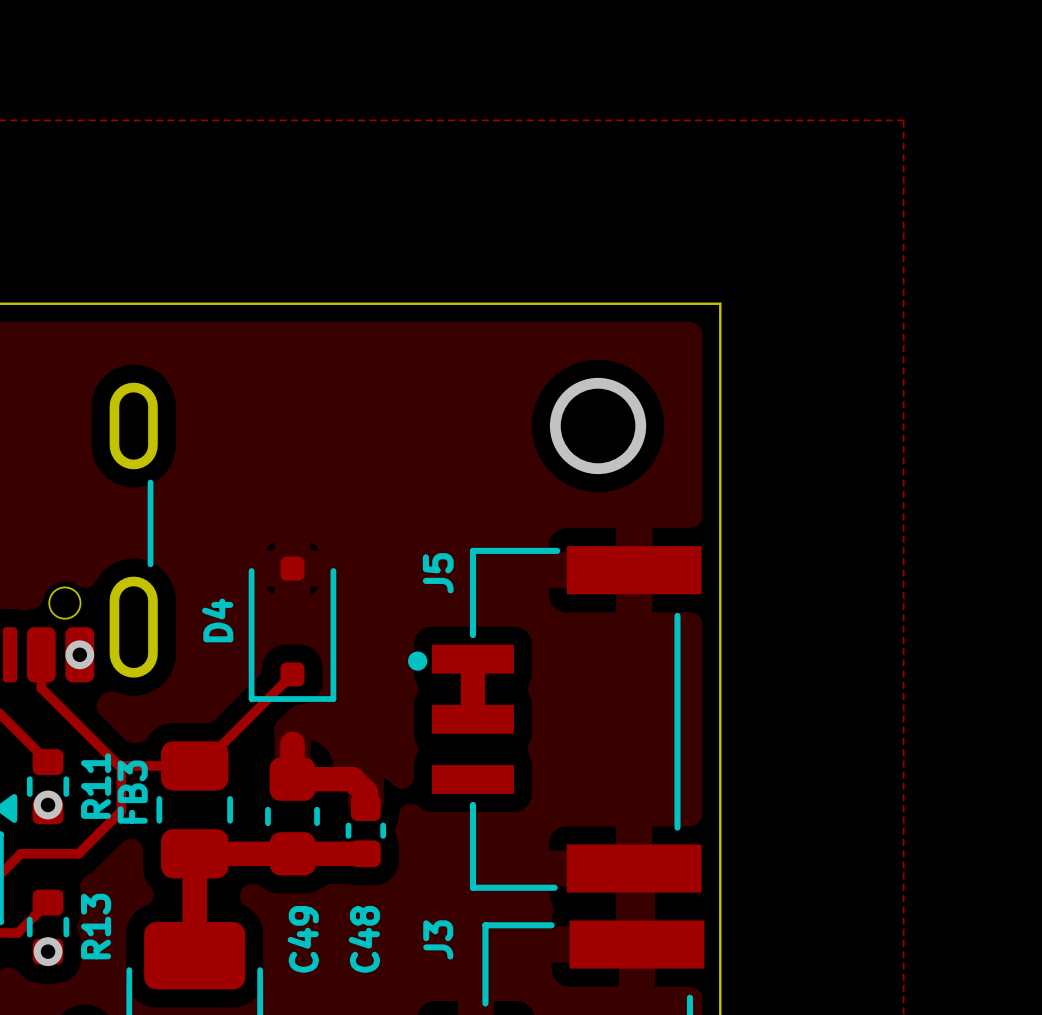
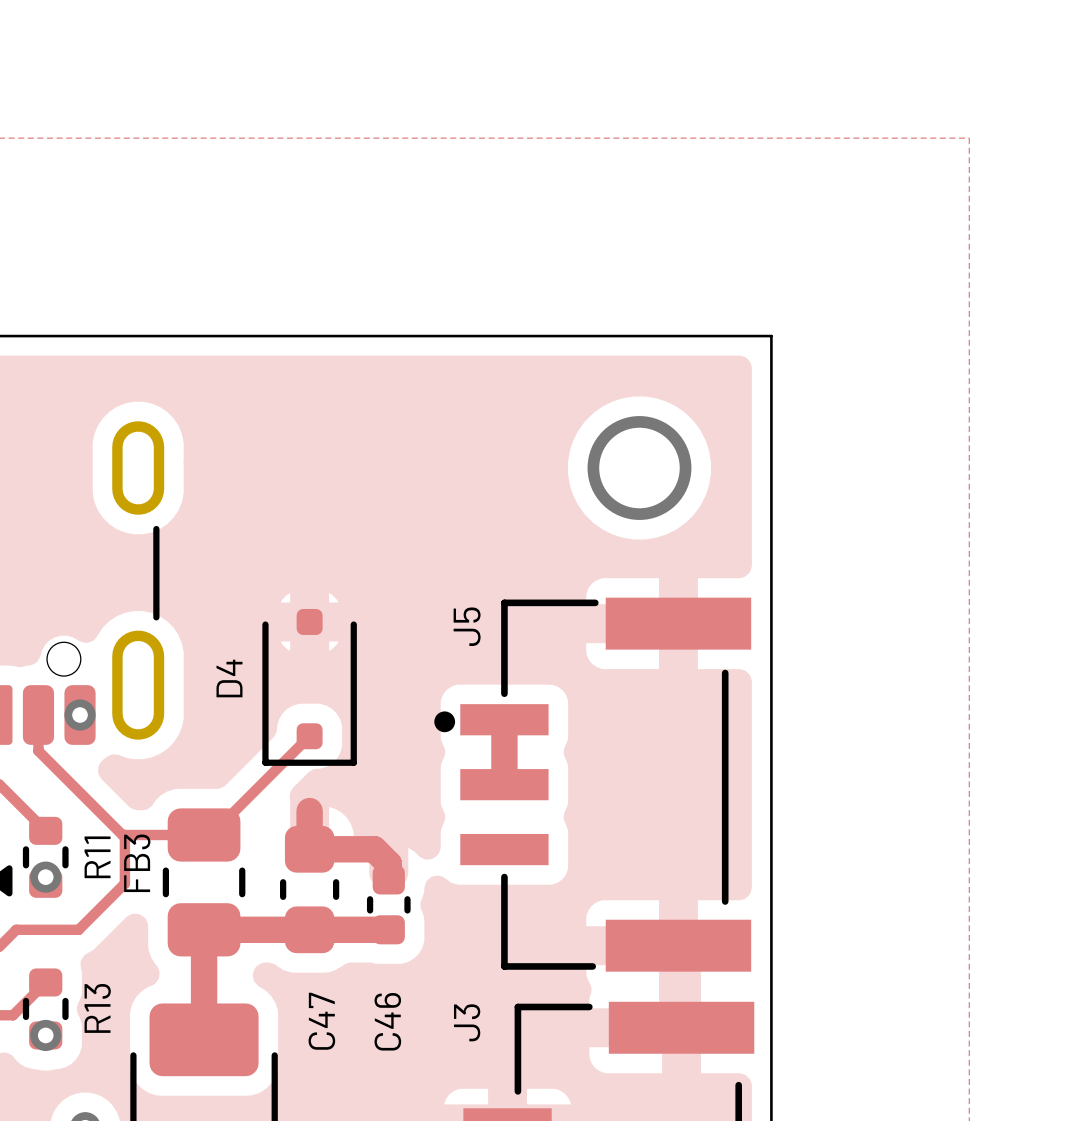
C49 name: C49 (303, 939) -> C47 (321, 1021)
C48 name: C48 (364, 939) -> C46 (387, 1021)

